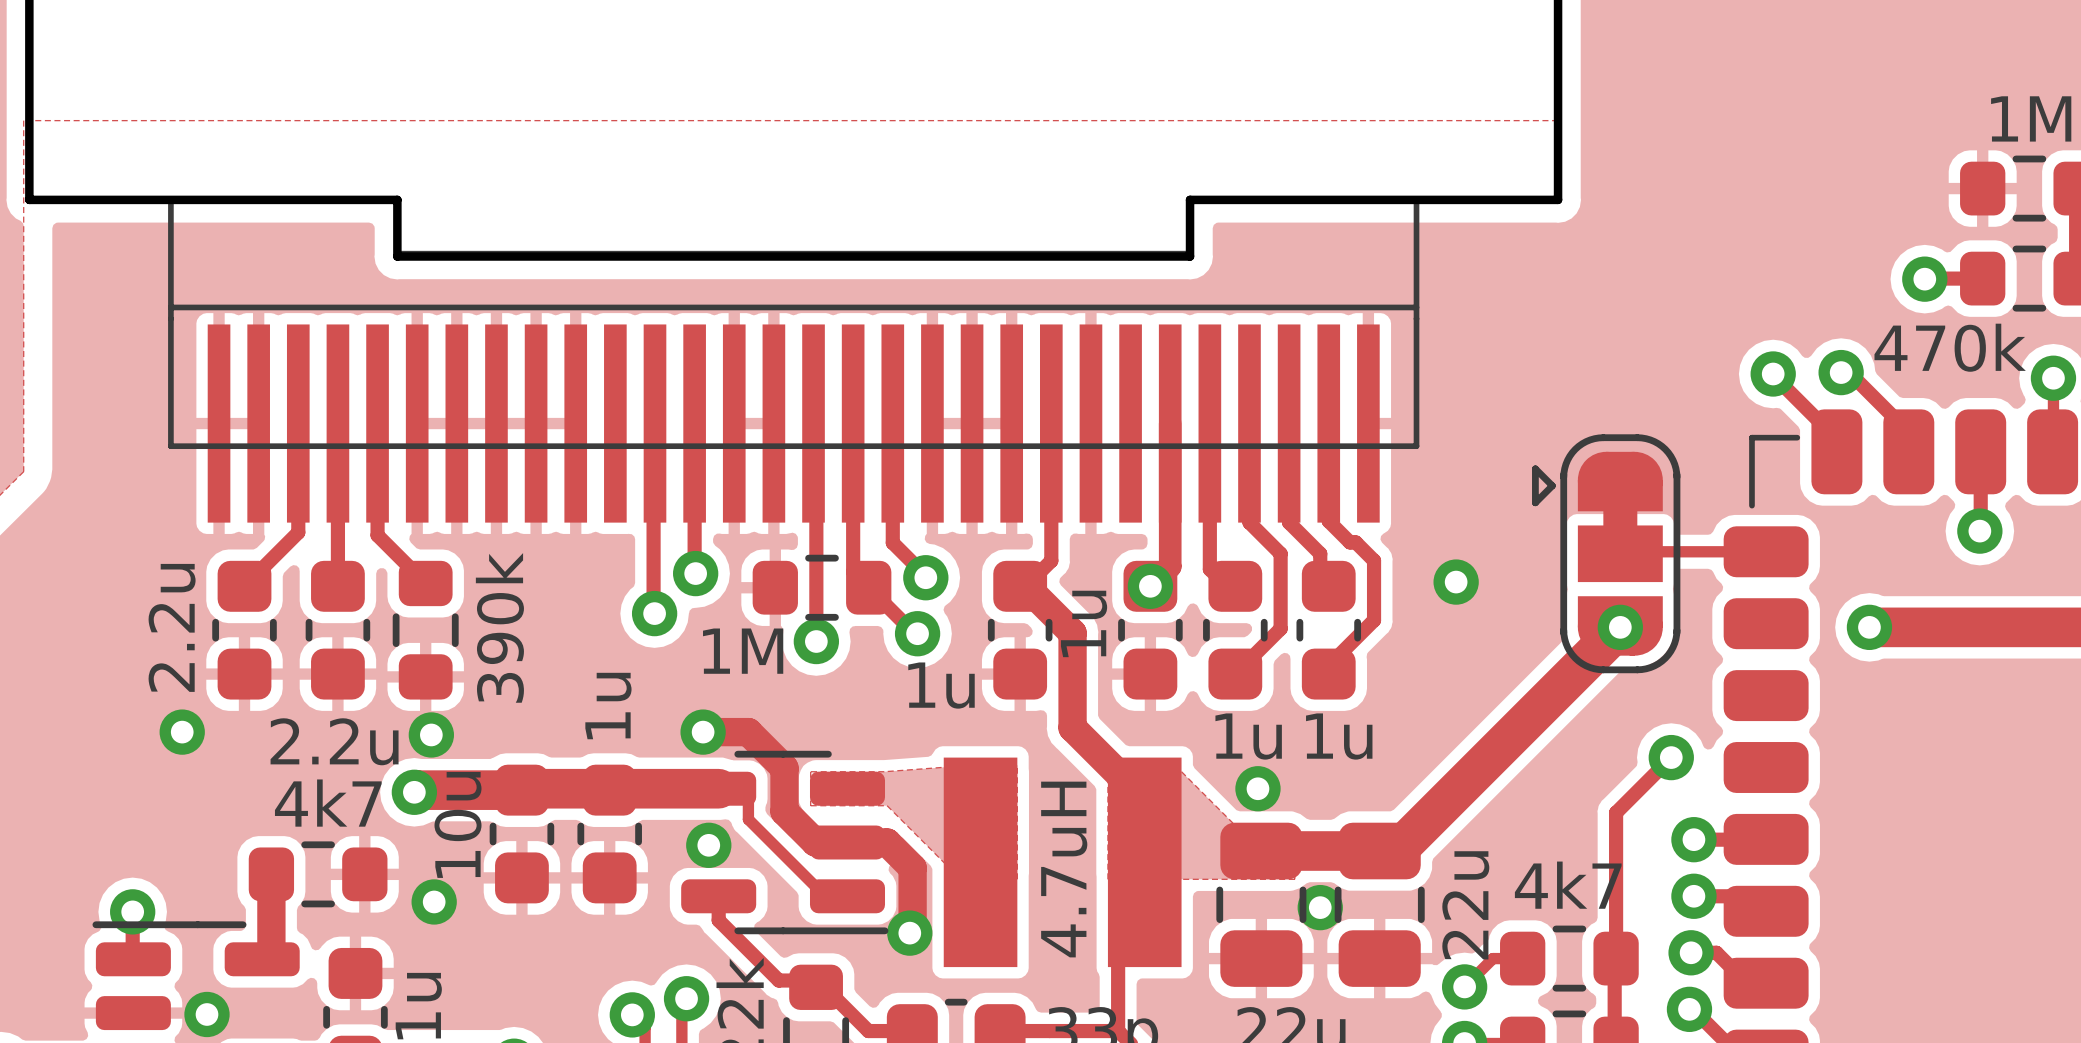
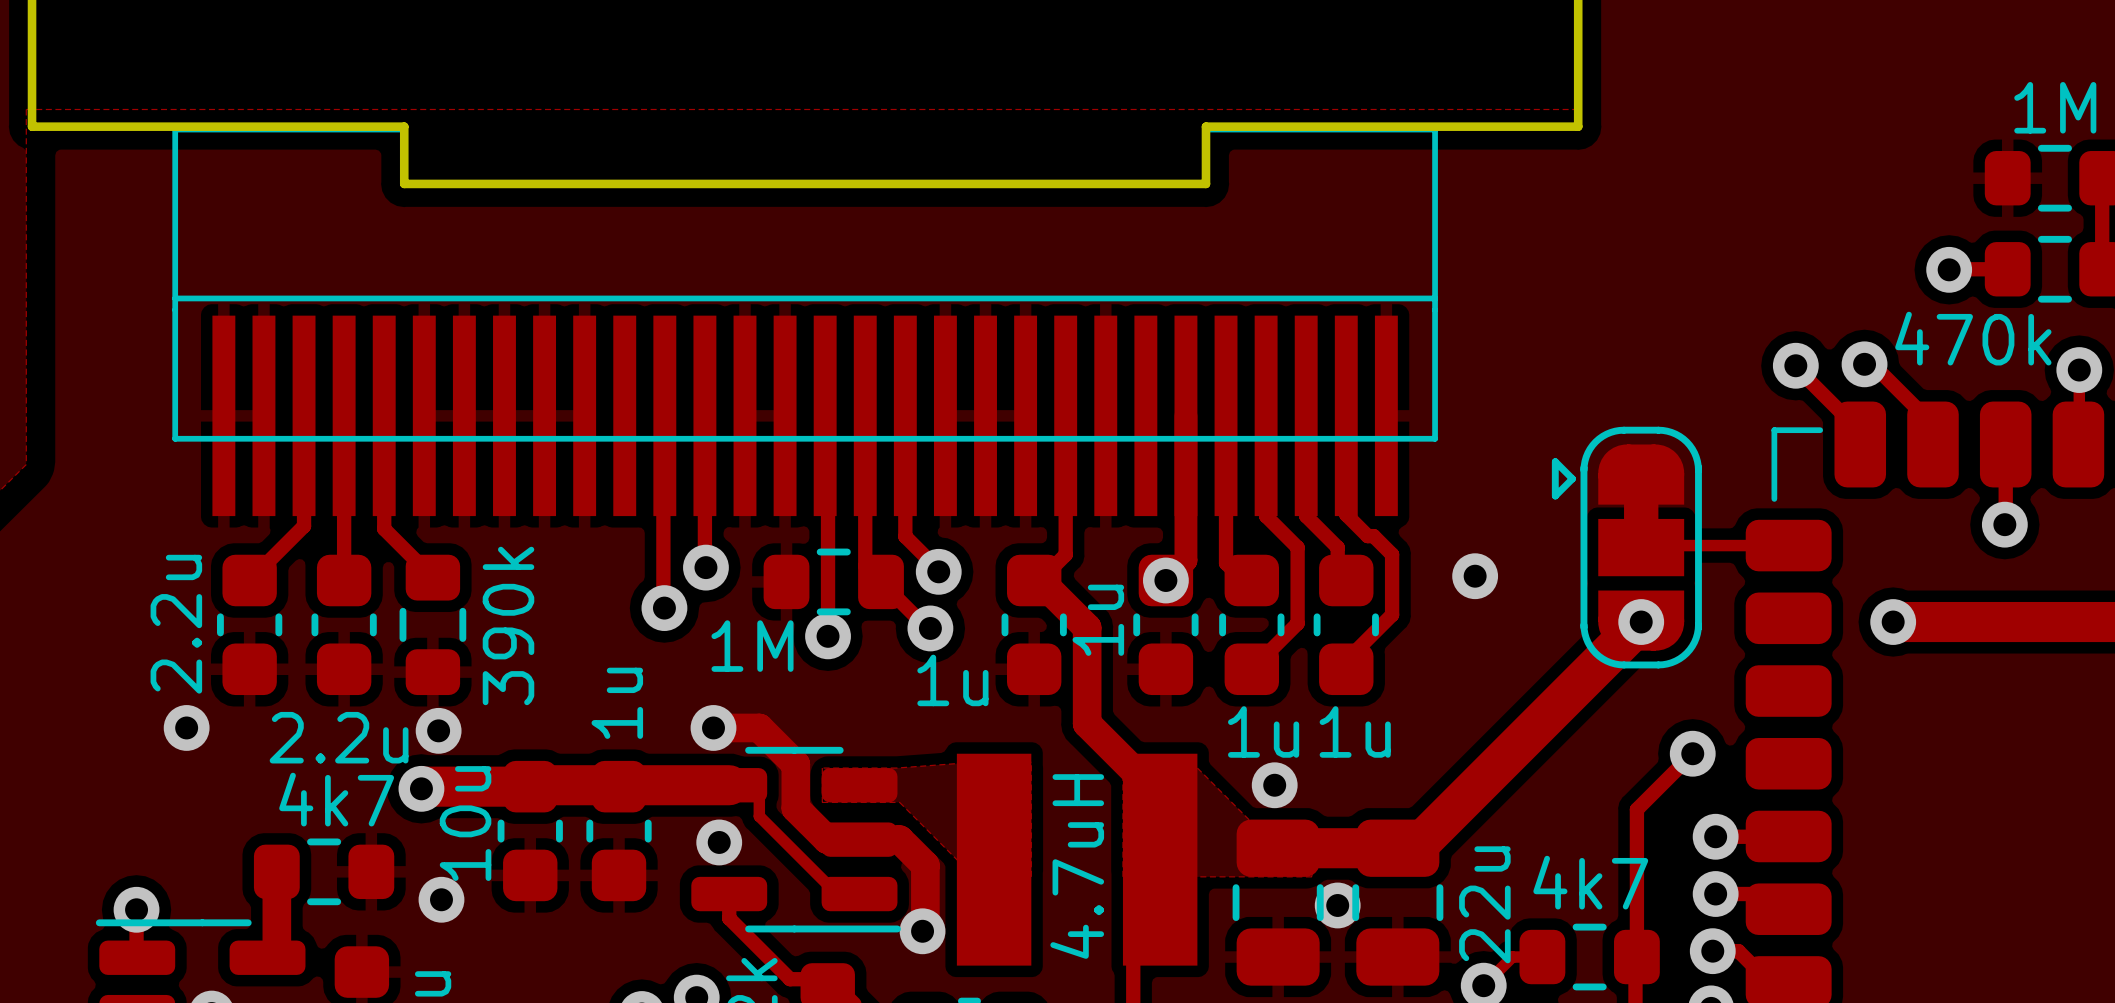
board edge: (29, 137) (29, 199) (397, 199) (397, 256) (1190, 256) (1190, 199) (1558, 199) (1558, 137) -> (32, 126) (404, 126) (404, 183) (1205, 183) (1205, 126) (1578, 126)
part footprint: [168, 197, 1420, 523] -> [172, 126, 1438, 517]

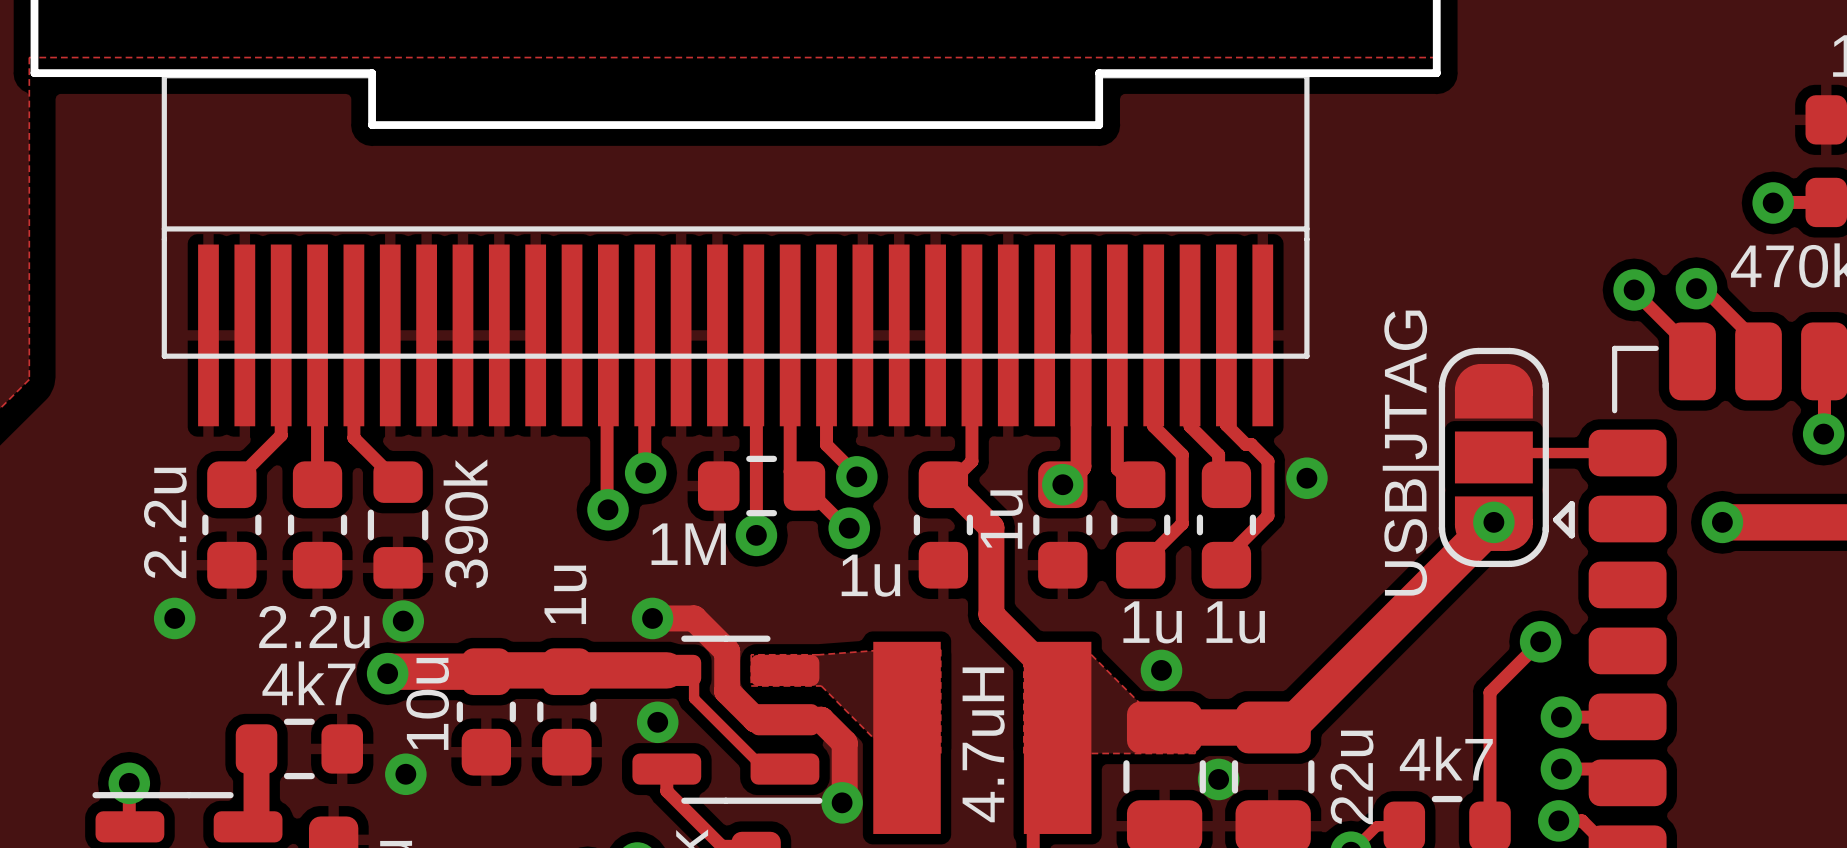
part footprint: [1551, 426, 1702, 669] -> [1438, 347, 1575, 568]
text: none -> USB|JTAG (1411, 453)
via position: (1475, 576) -> (1306, 478)

